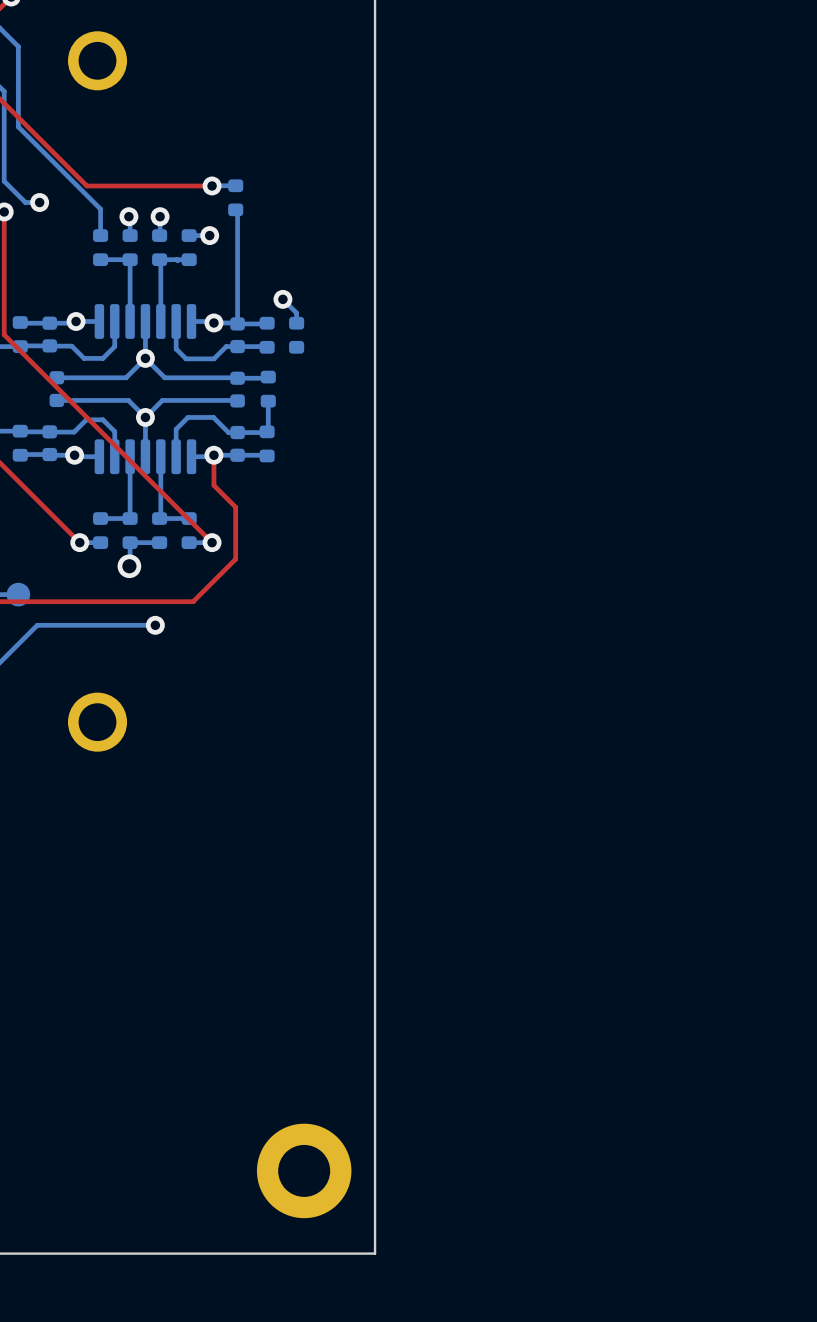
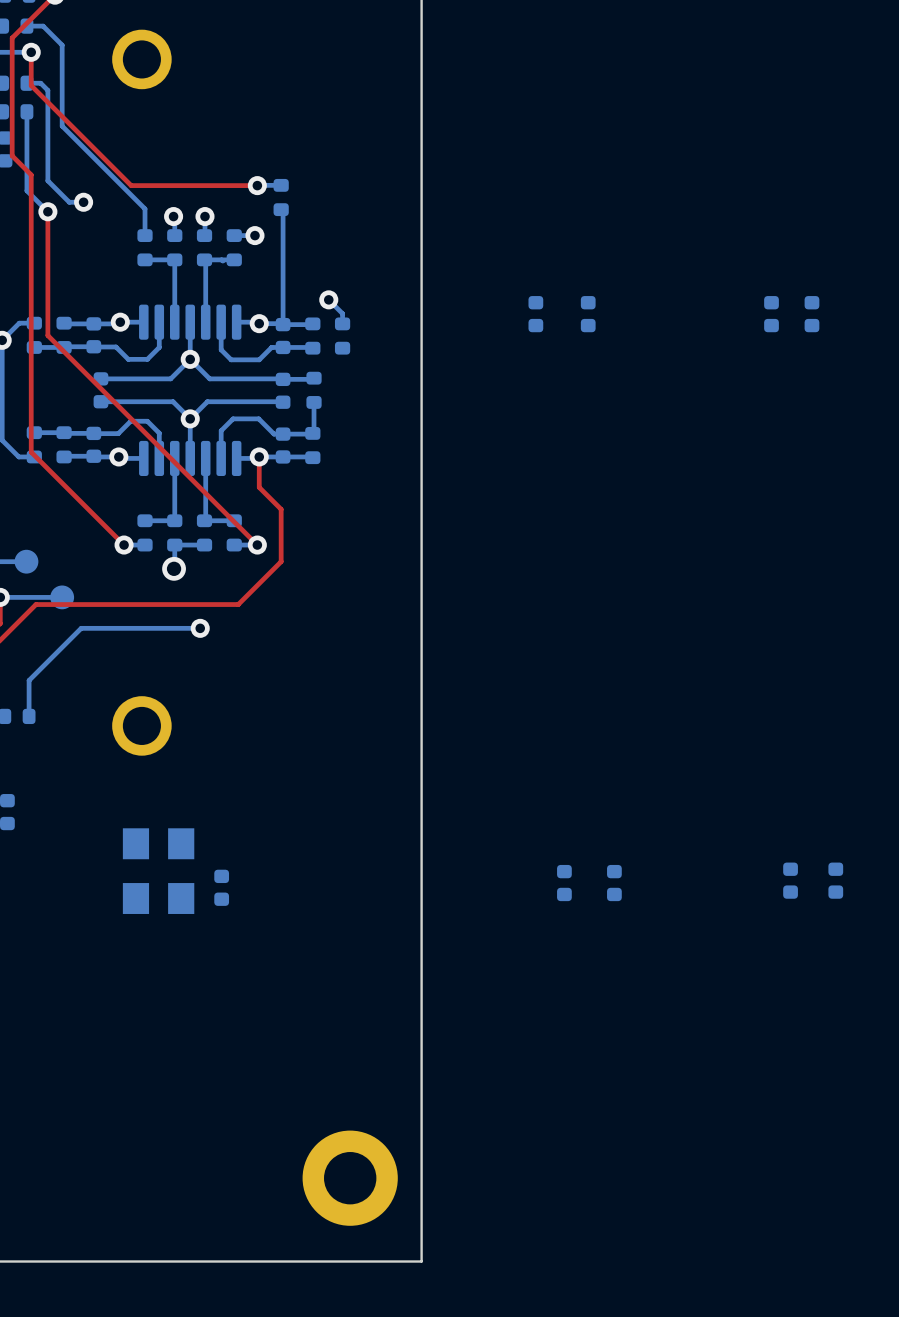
part: none -> (535, 314)
part: none -> (588, 314)
part: none -> (771, 314)
part: none -> (811, 314)
part: none -> (158, 871)
part: none -> (790, 880)
part: none -> (835, 880)
part: none -> (564, 883)
part: none -> (614, 883)
part: none -> (221, 887)

